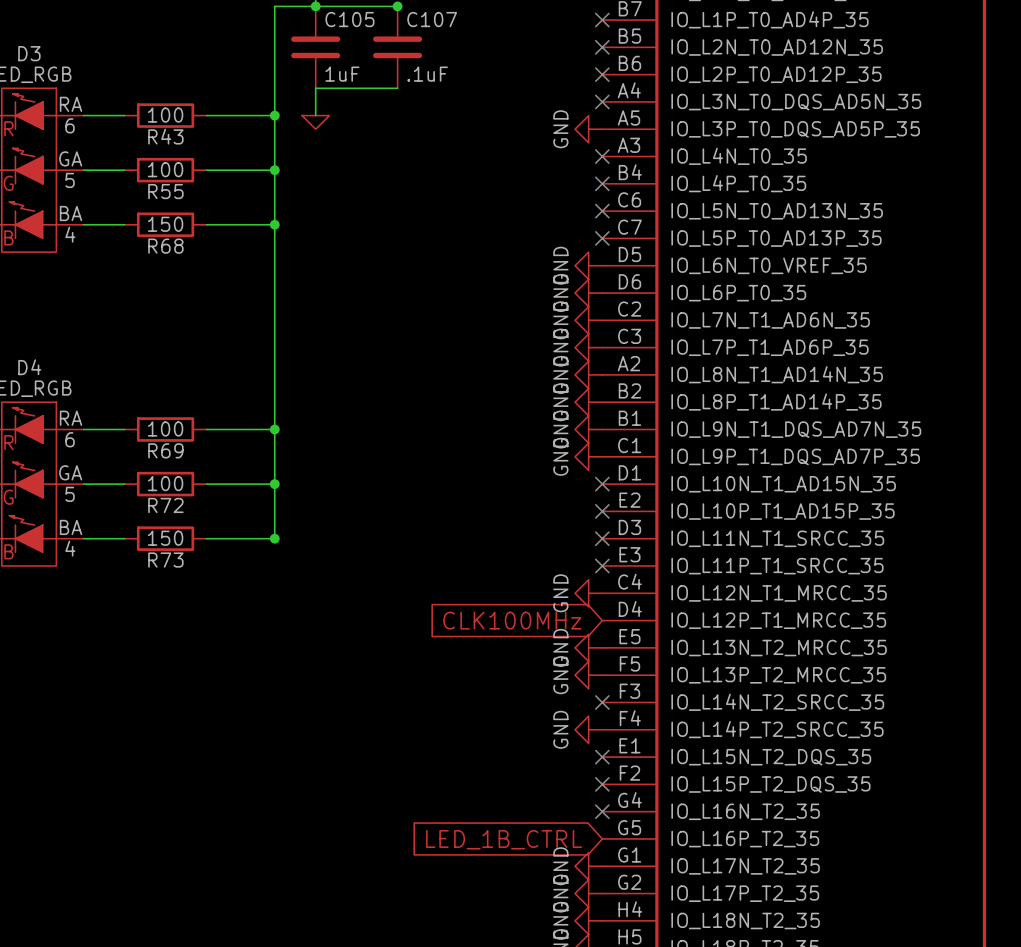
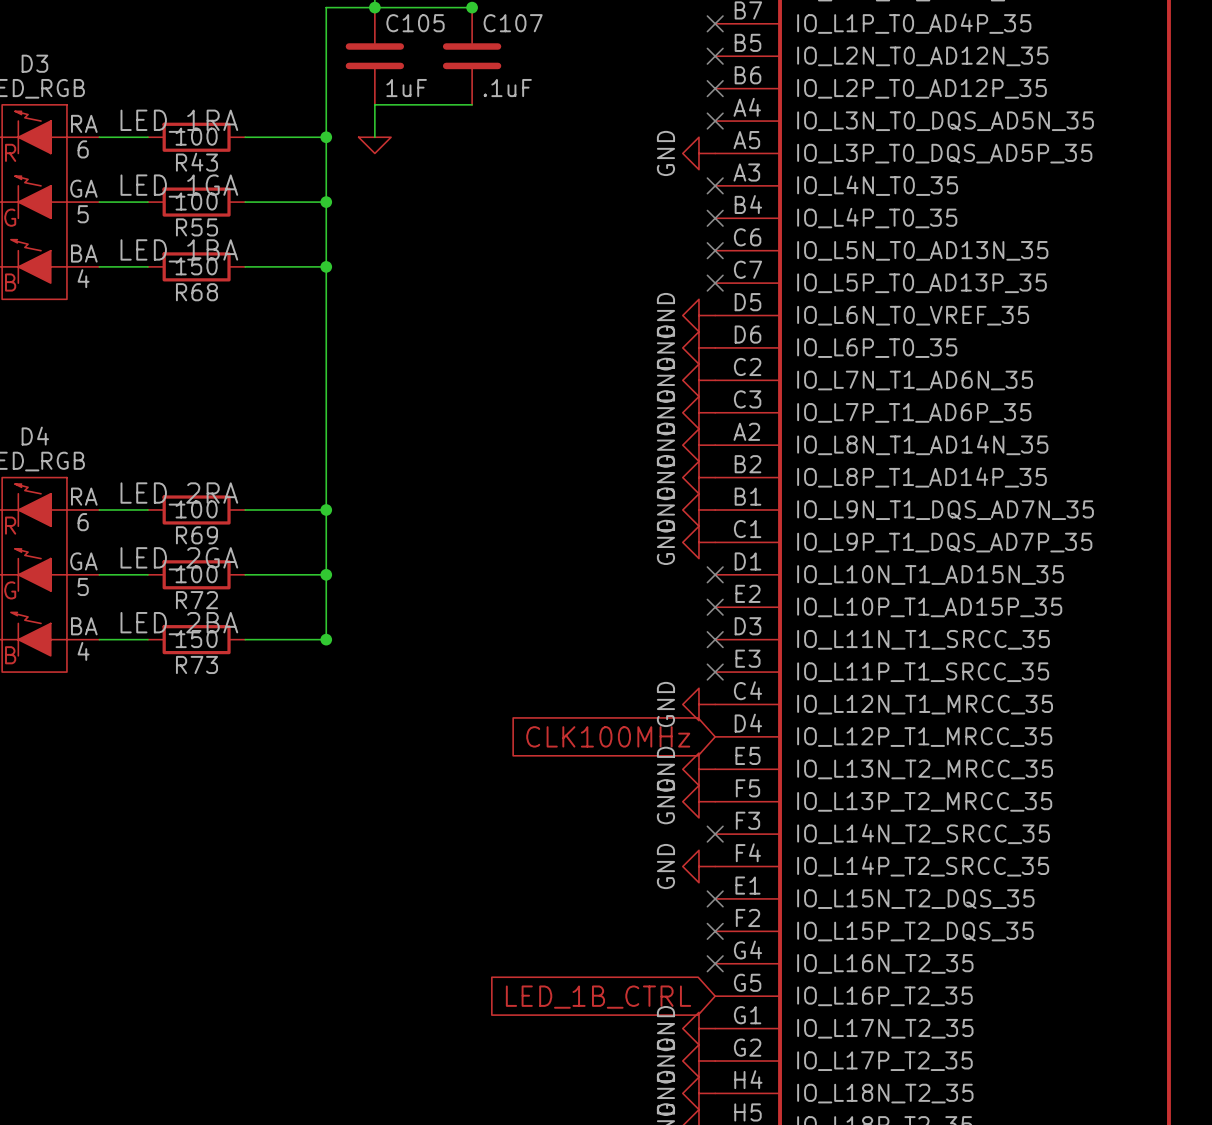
label: none -> LED_1RA (179, 121)
label: none -> LED_1GA (179, 186)
label: none -> LED_1BA (179, 250)
label: none -> LED_2RA (179, 493)
label: none -> LED_2GA (179, 558)
label: none -> LED_2BA (179, 623)

